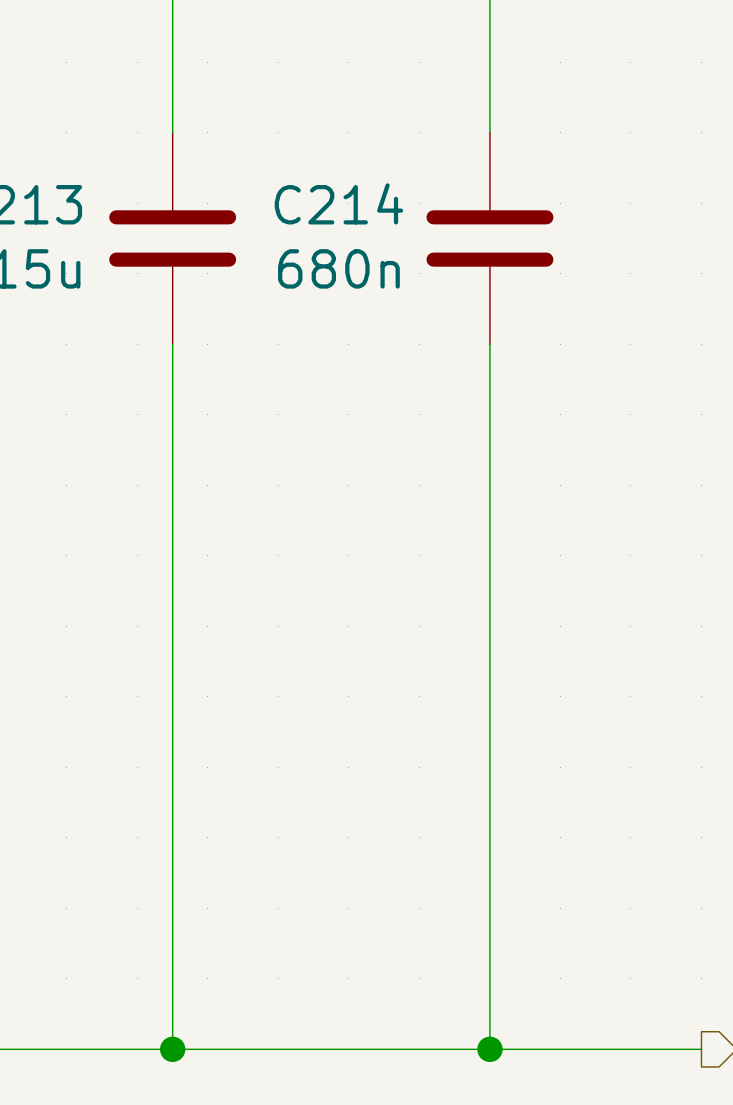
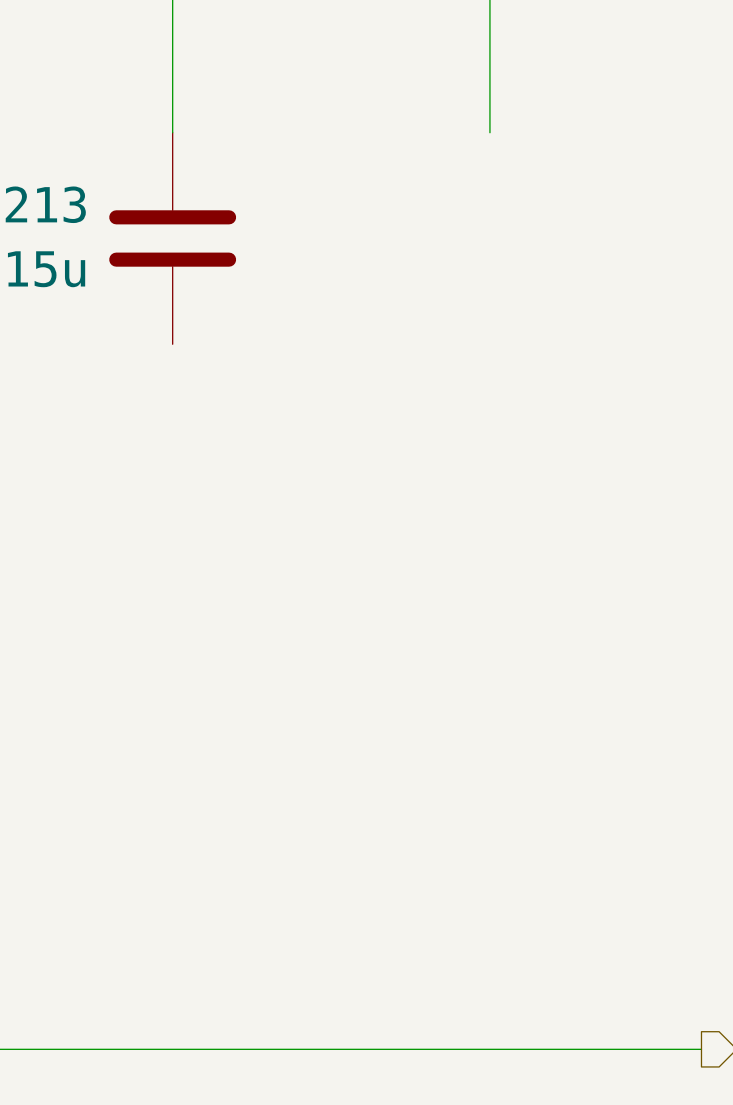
C214: 680n (489, 238) -> none
wire: (172, 344) (172, 1049) -> none
wire: (489, 344) (489, 1049) -> none
junction: (172, 1049) -> none
junction: (489, 1049) -> none

